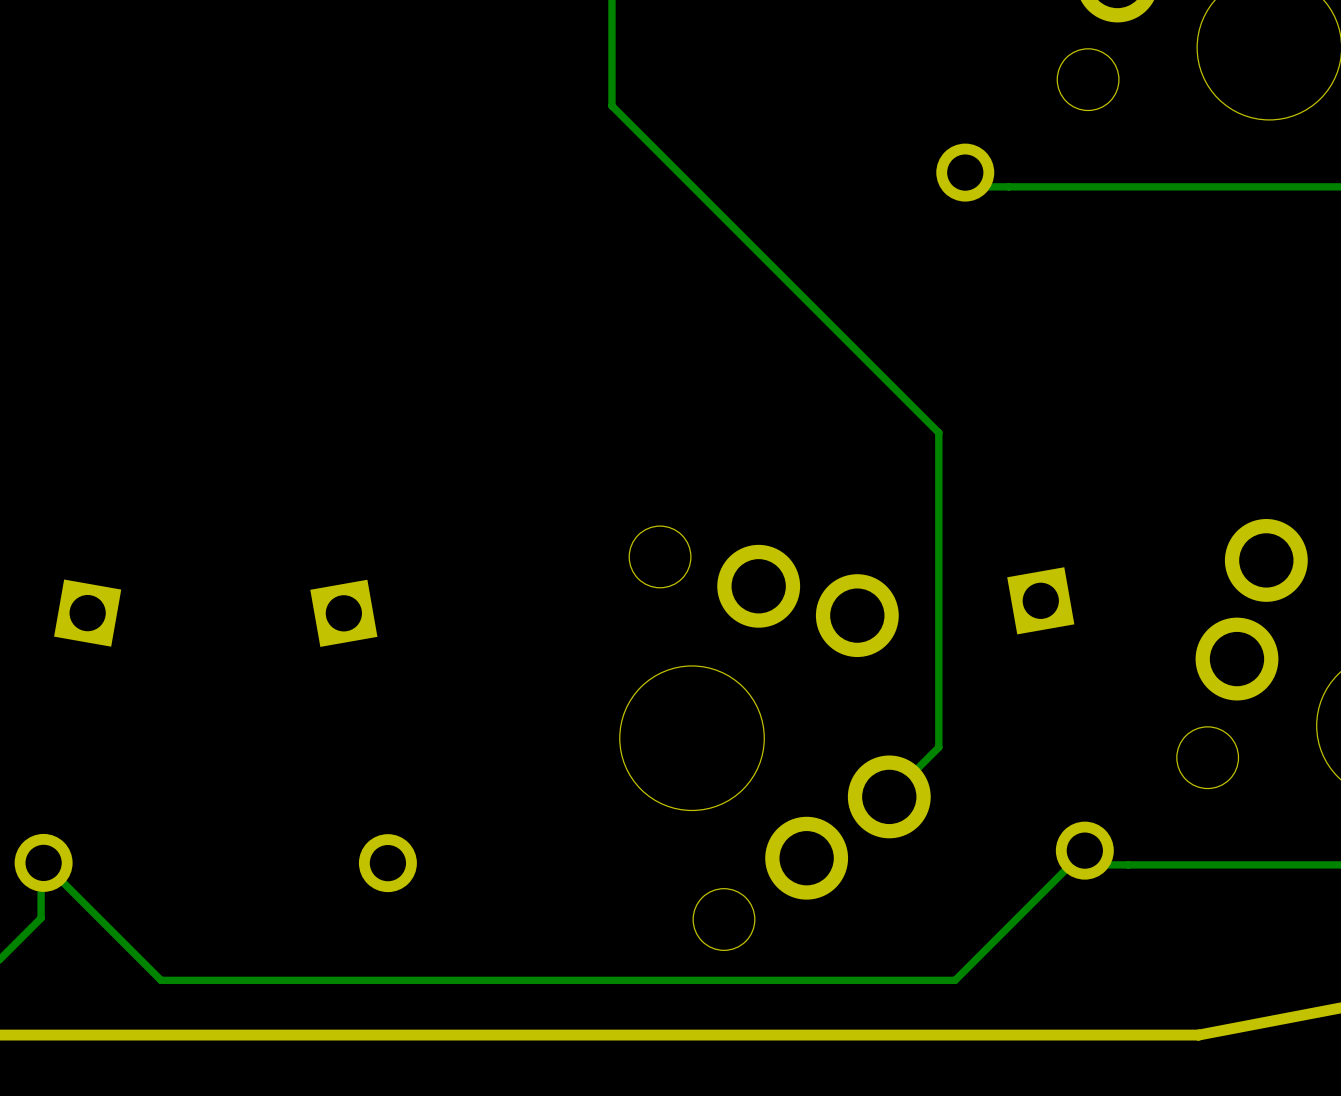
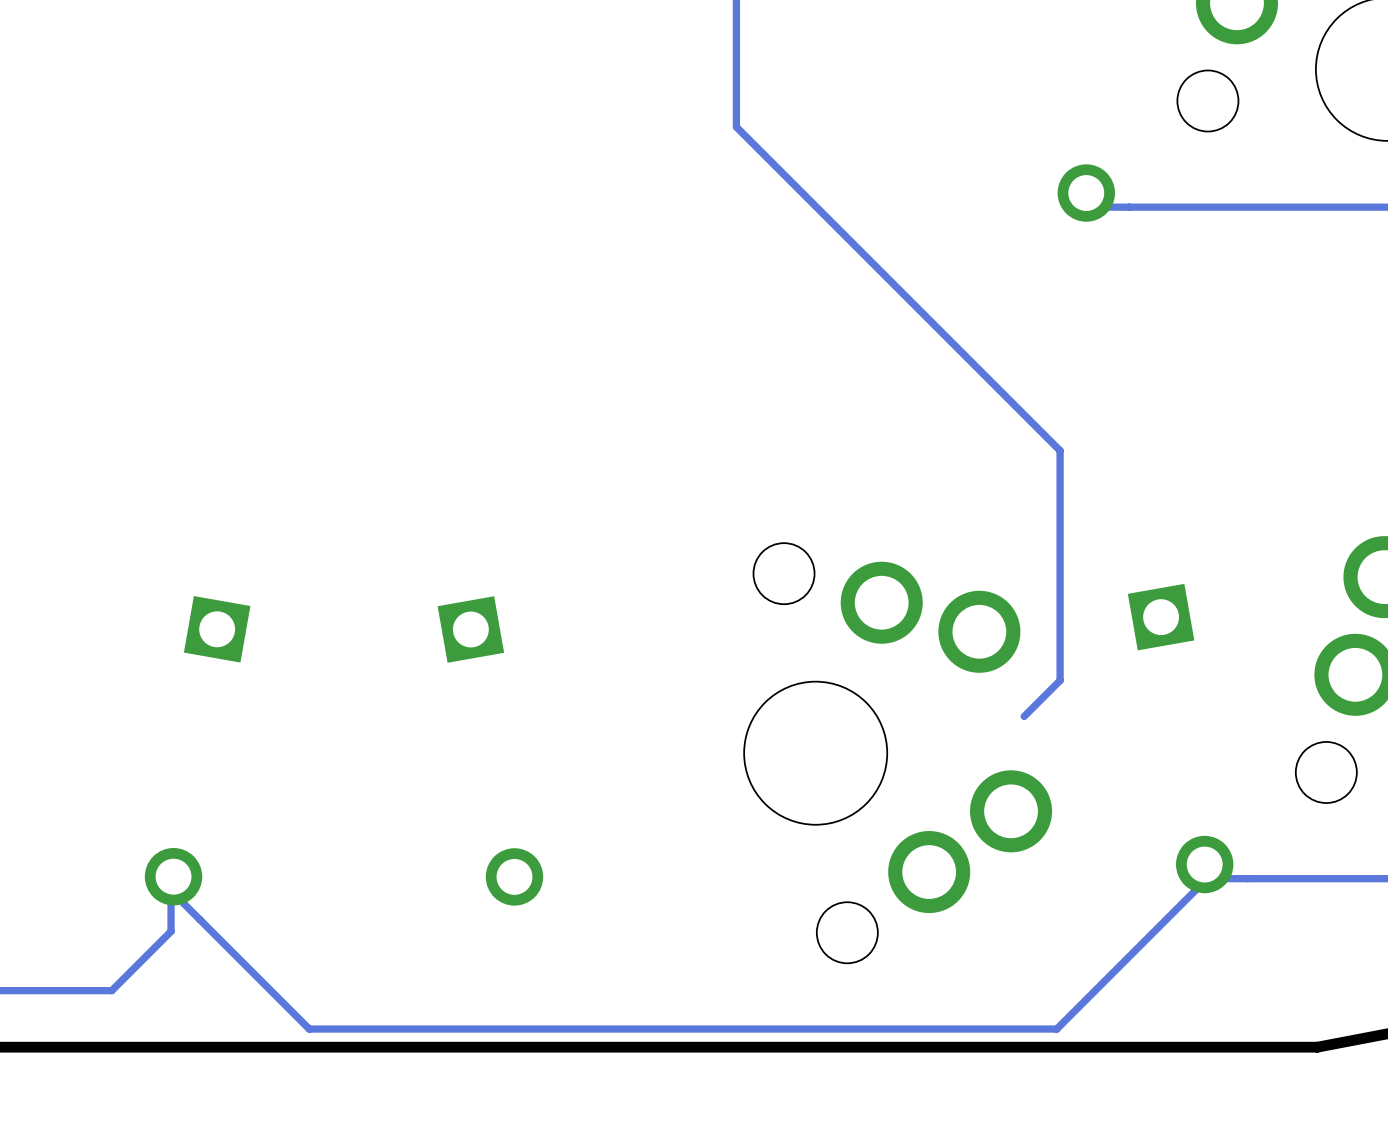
track: (938, 664) (938, 747) (889, 796) -> (1060, 680) (1024, 716)
track: (1084, 850) (955, 980) (161, 980) (43, 862) -> none
track: none -> (1207, 878) (1056, 1029) (309, 1029) (171, 890)

